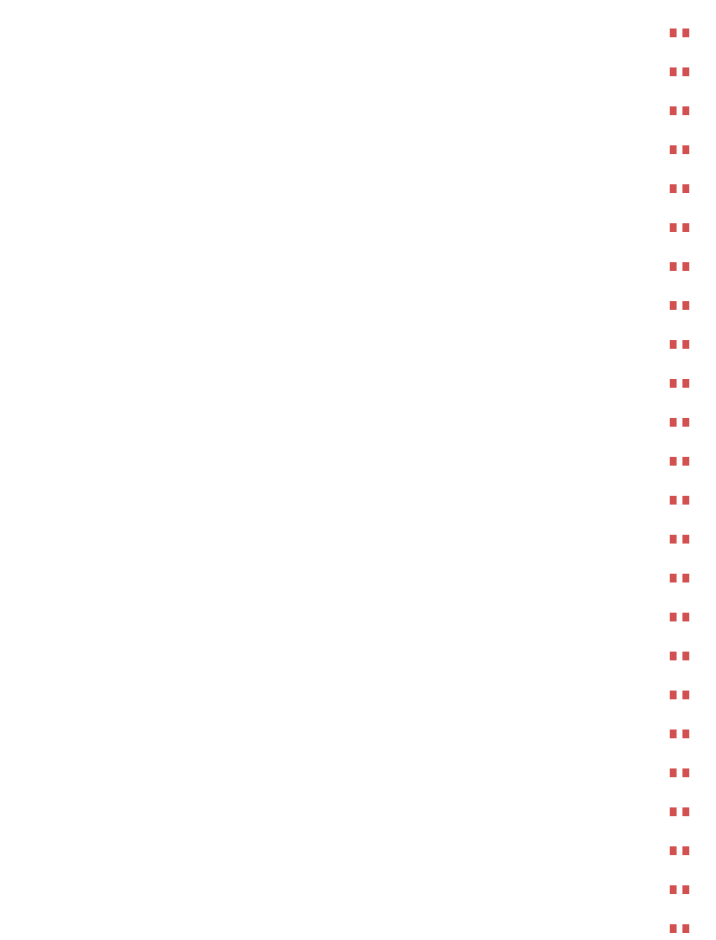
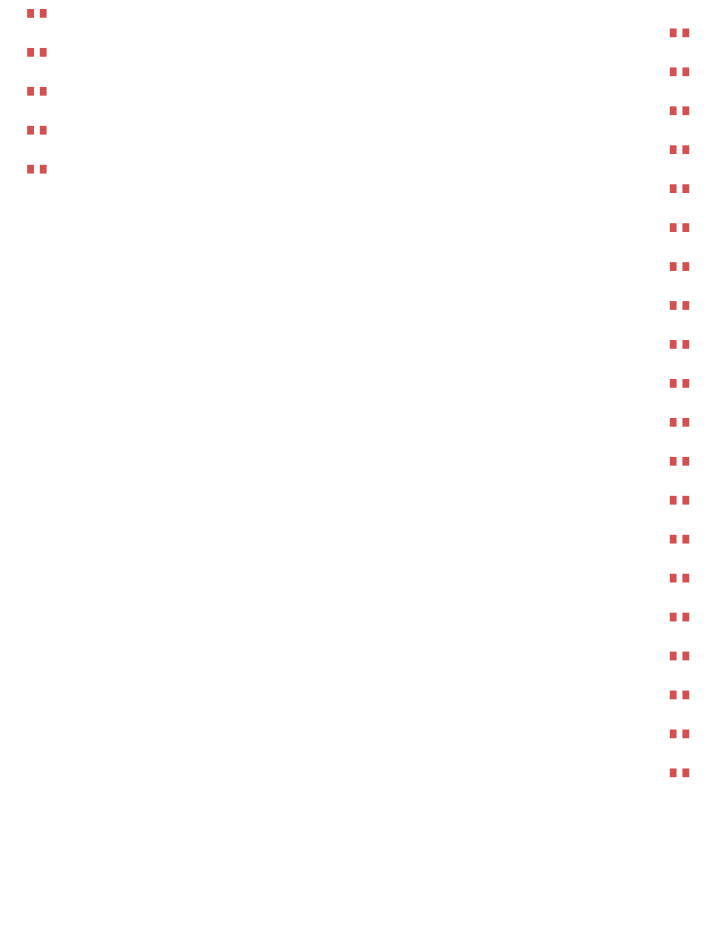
part: none -> (36, 13)
part: none -> (36, 52)
part: none -> (36, 91)
part: none -> (36, 130)
part: none -> (36, 169)
part: (679, 811) -> none
part: (679, 850) -> none
part: (679, 889) -> none
part: (679, 928) -> none

